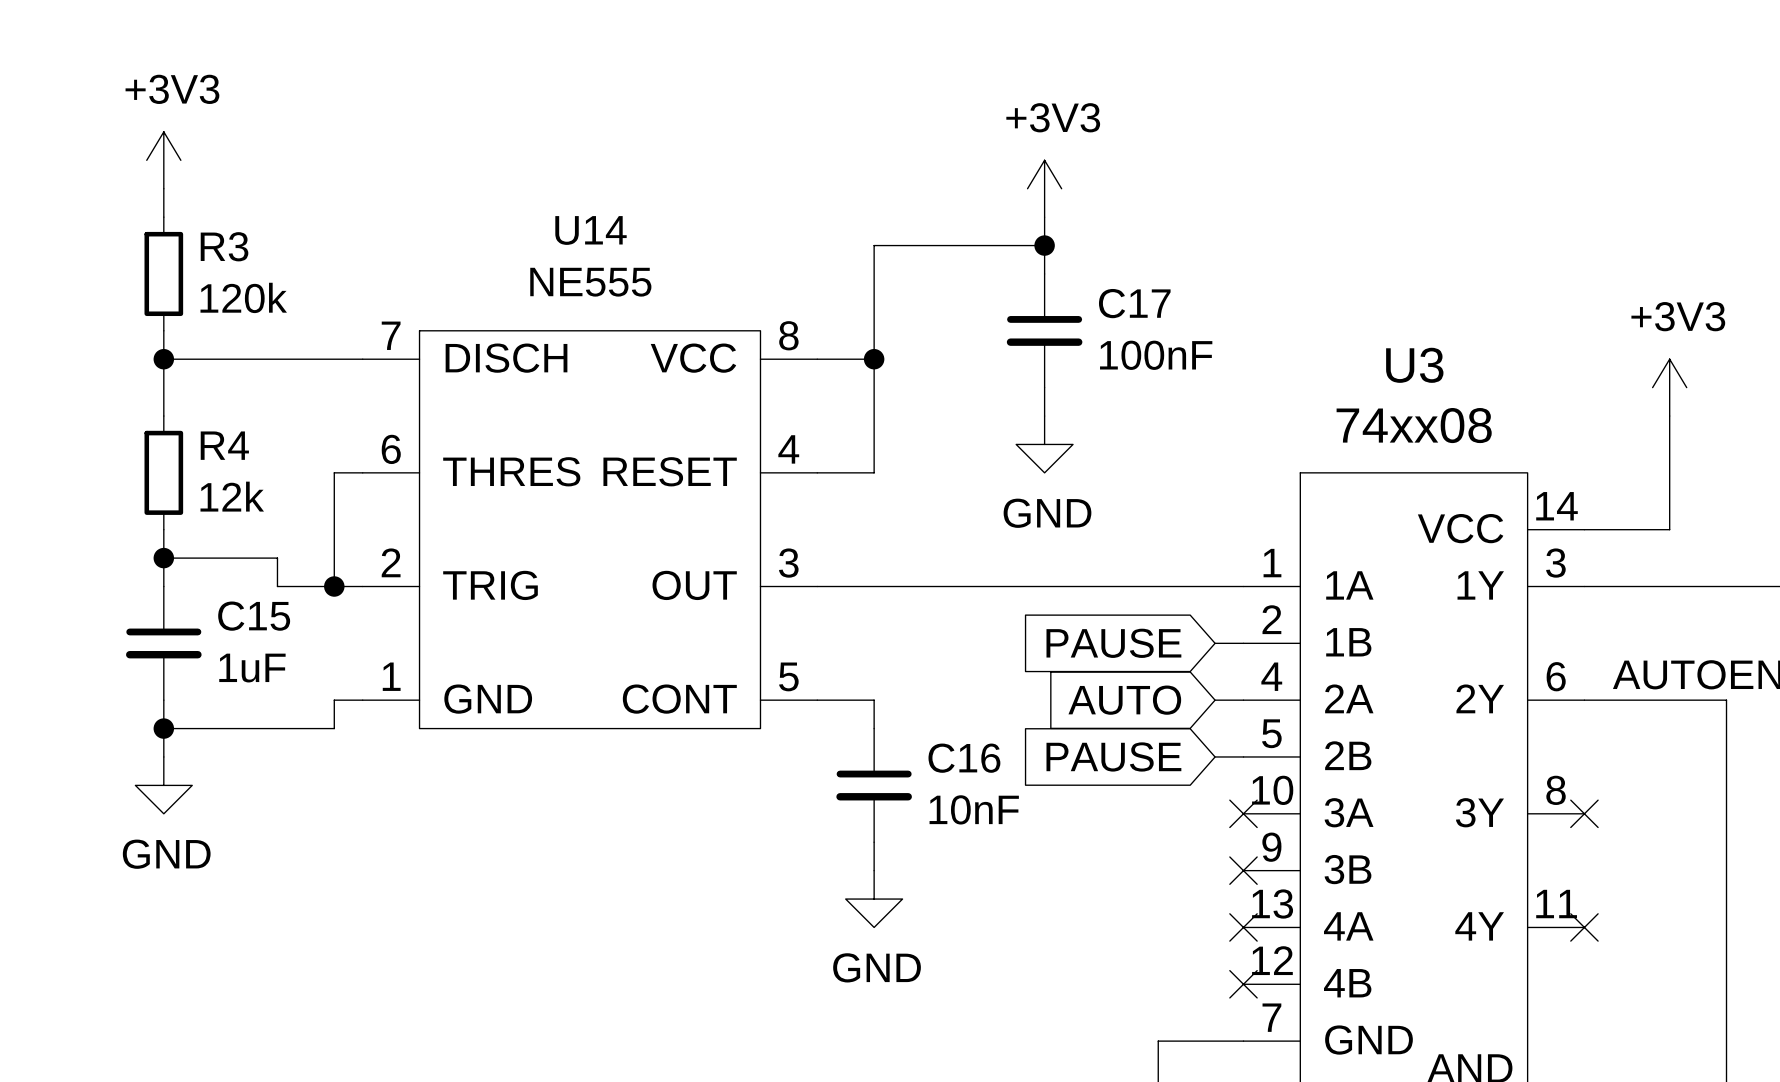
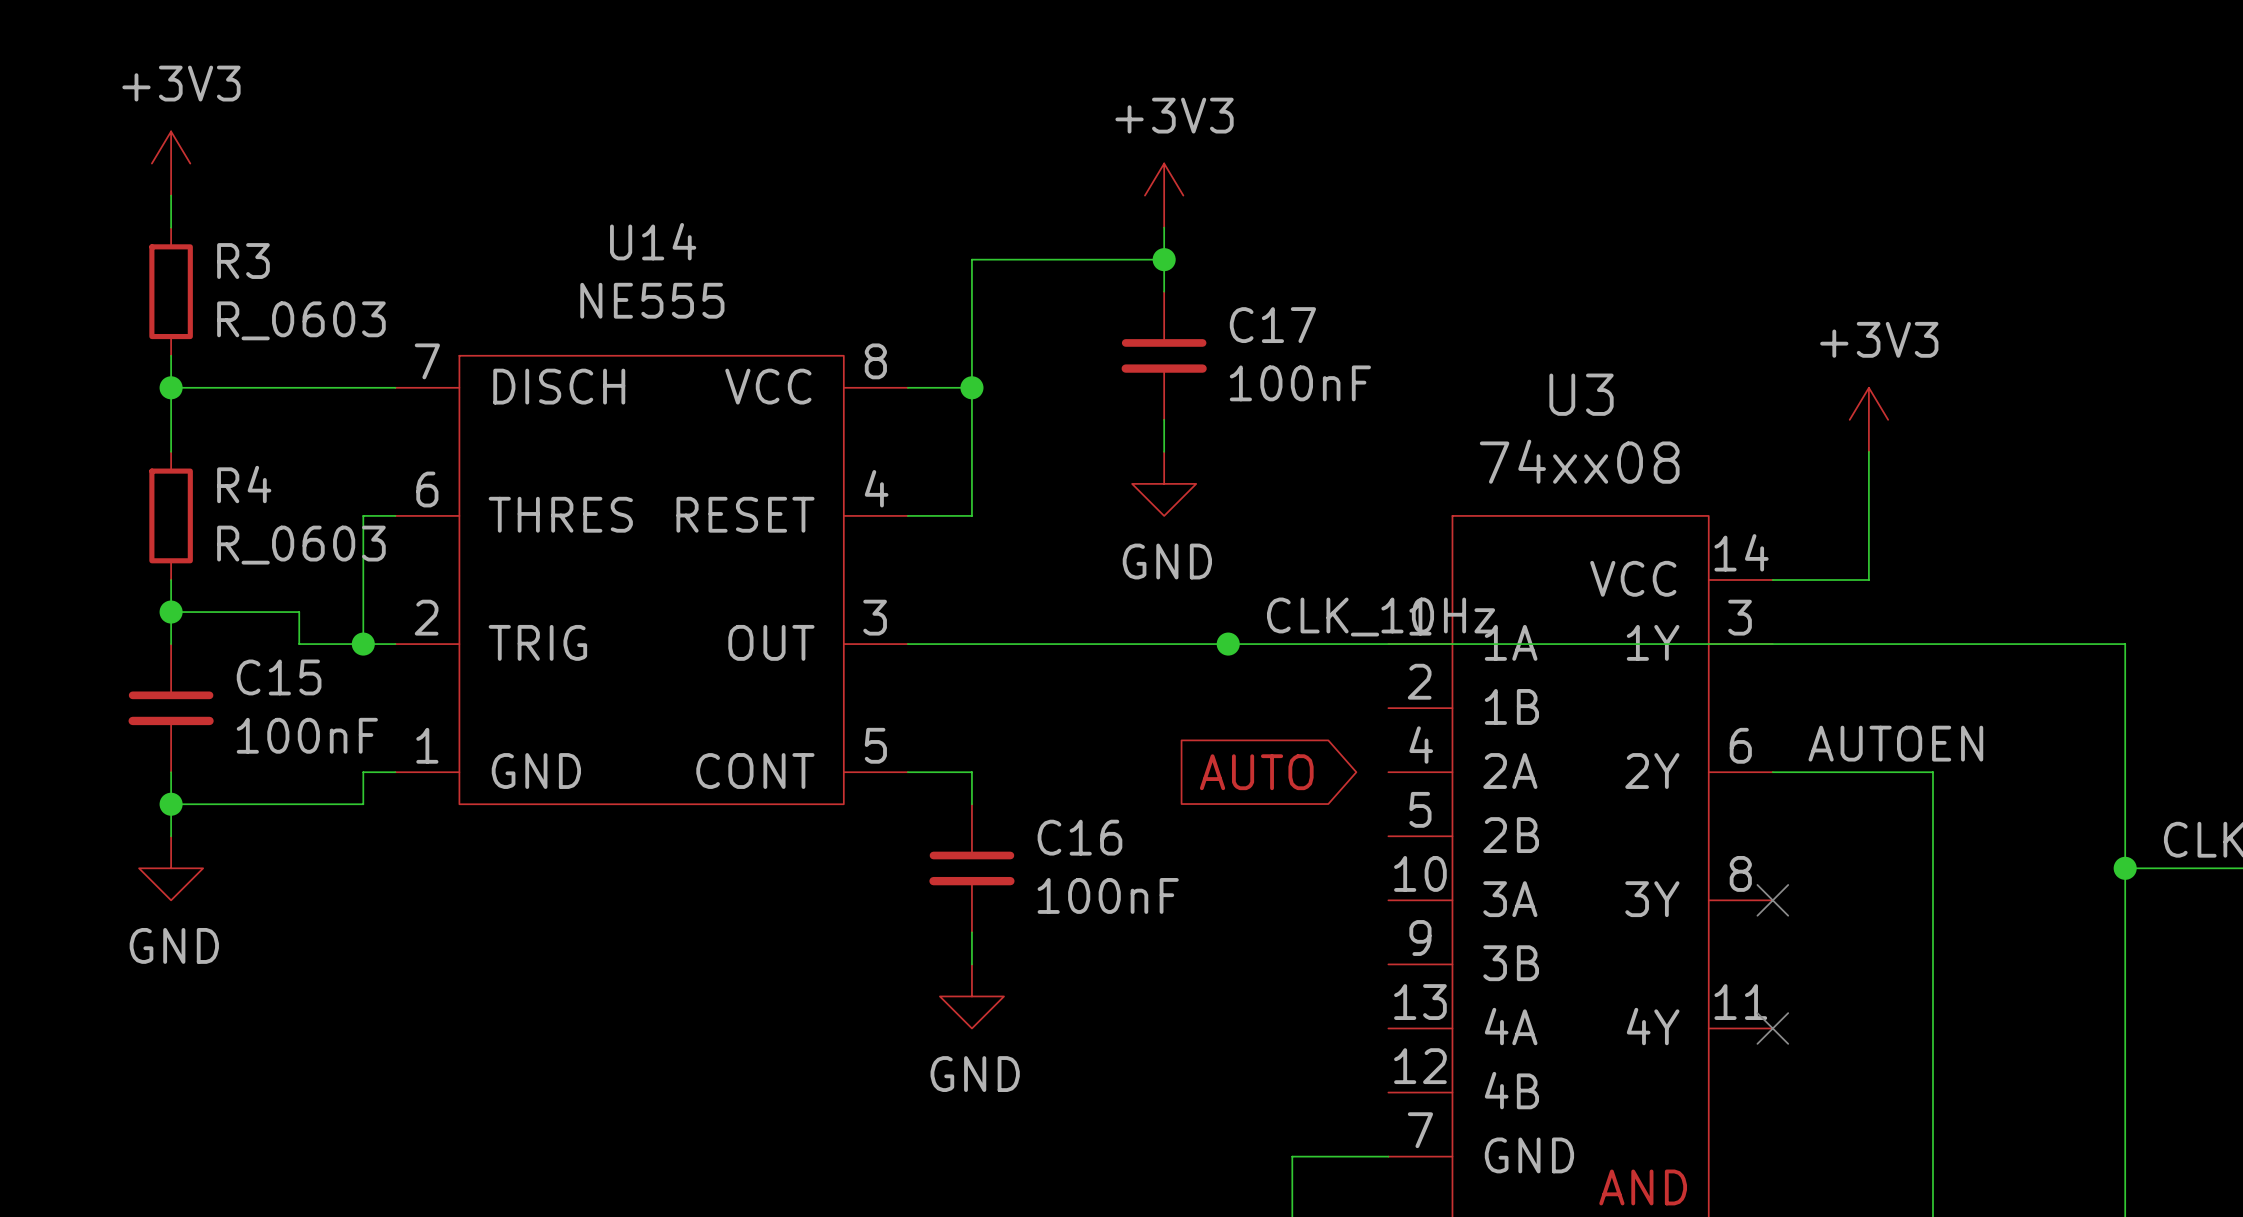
R3 value: 120k (243, 297) -> R_0603 (301, 320)
R4 value: 12k (232, 496) -> R_0603 (301, 545)
label: none -> CLK_10Hz (1381, 617)
junction: none -> (1228, 644)
wire: none -> (1388, 644) (1772, 644)
global label: PAUSE (1113, 643) -> none
wire: (1215, 643) (1243, 643) -> none
C15 value: 1uF (252, 668) -> 100nF (307, 735)
wire: (1215, 700) (1243, 700) -> none
global label: PAUSE (1113, 756) -> none
wire: (1215, 756) (1243, 756) -> none
C16 value: 10nF (974, 809) -> 100nF (1108, 895)
no-connect mark: (1243, 813) -> none
no-connect mark: (1243, 870) -> none
no-connect mark: (1243, 927) -> none
no-connect mark: (1243, 984) -> none

